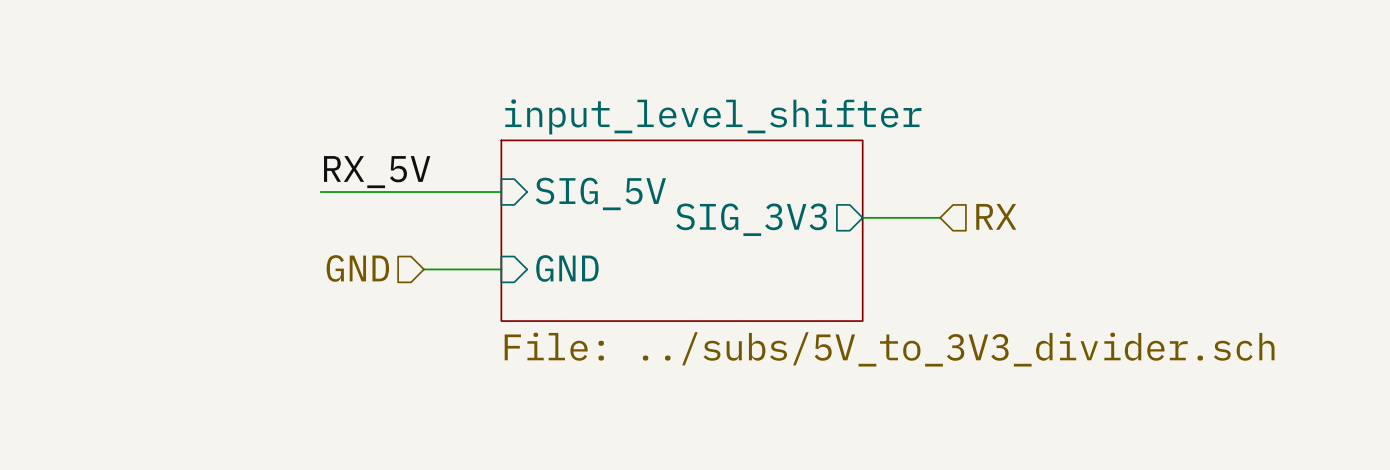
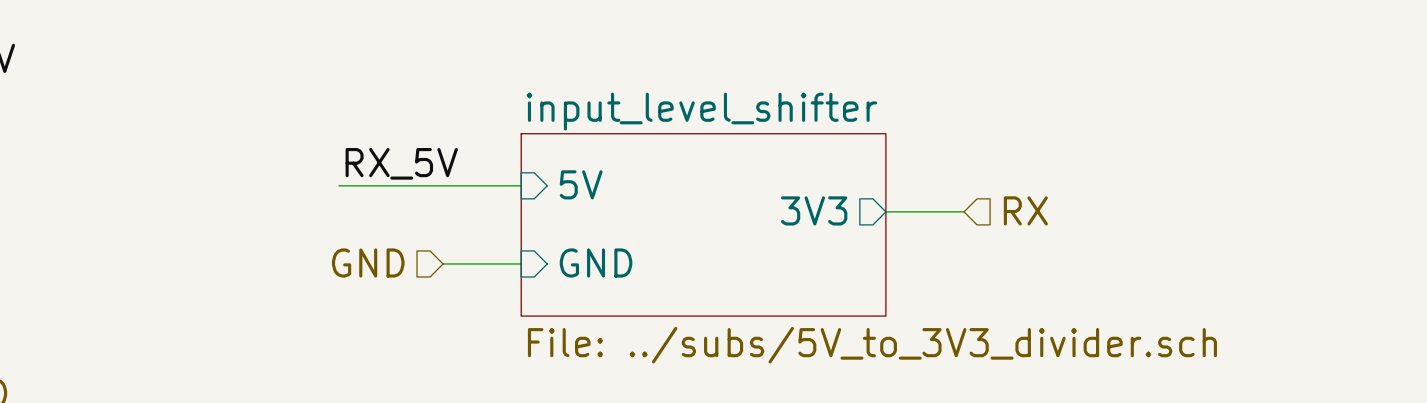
sheet pin: SIG_5V (600, 193) -> 5V (581, 184)
sheet pin: SIG_3V3 (751, 219) -> 3V3 (814, 210)

